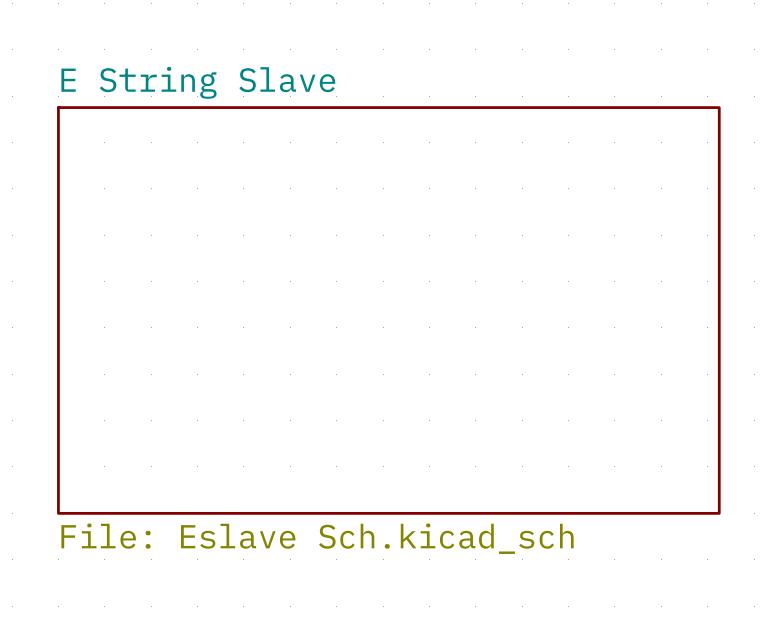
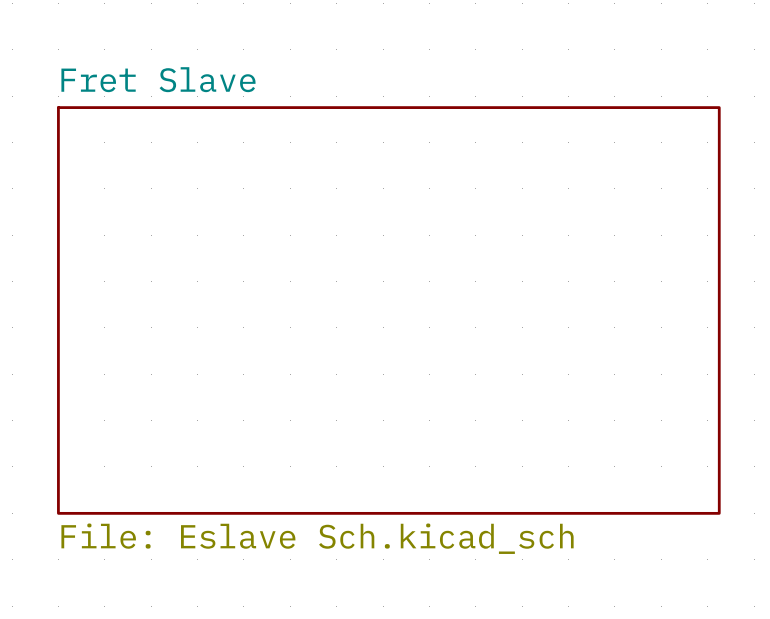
sheet E String Slave name: E String Slave (198, 82) -> Fret Slave (158, 79)

